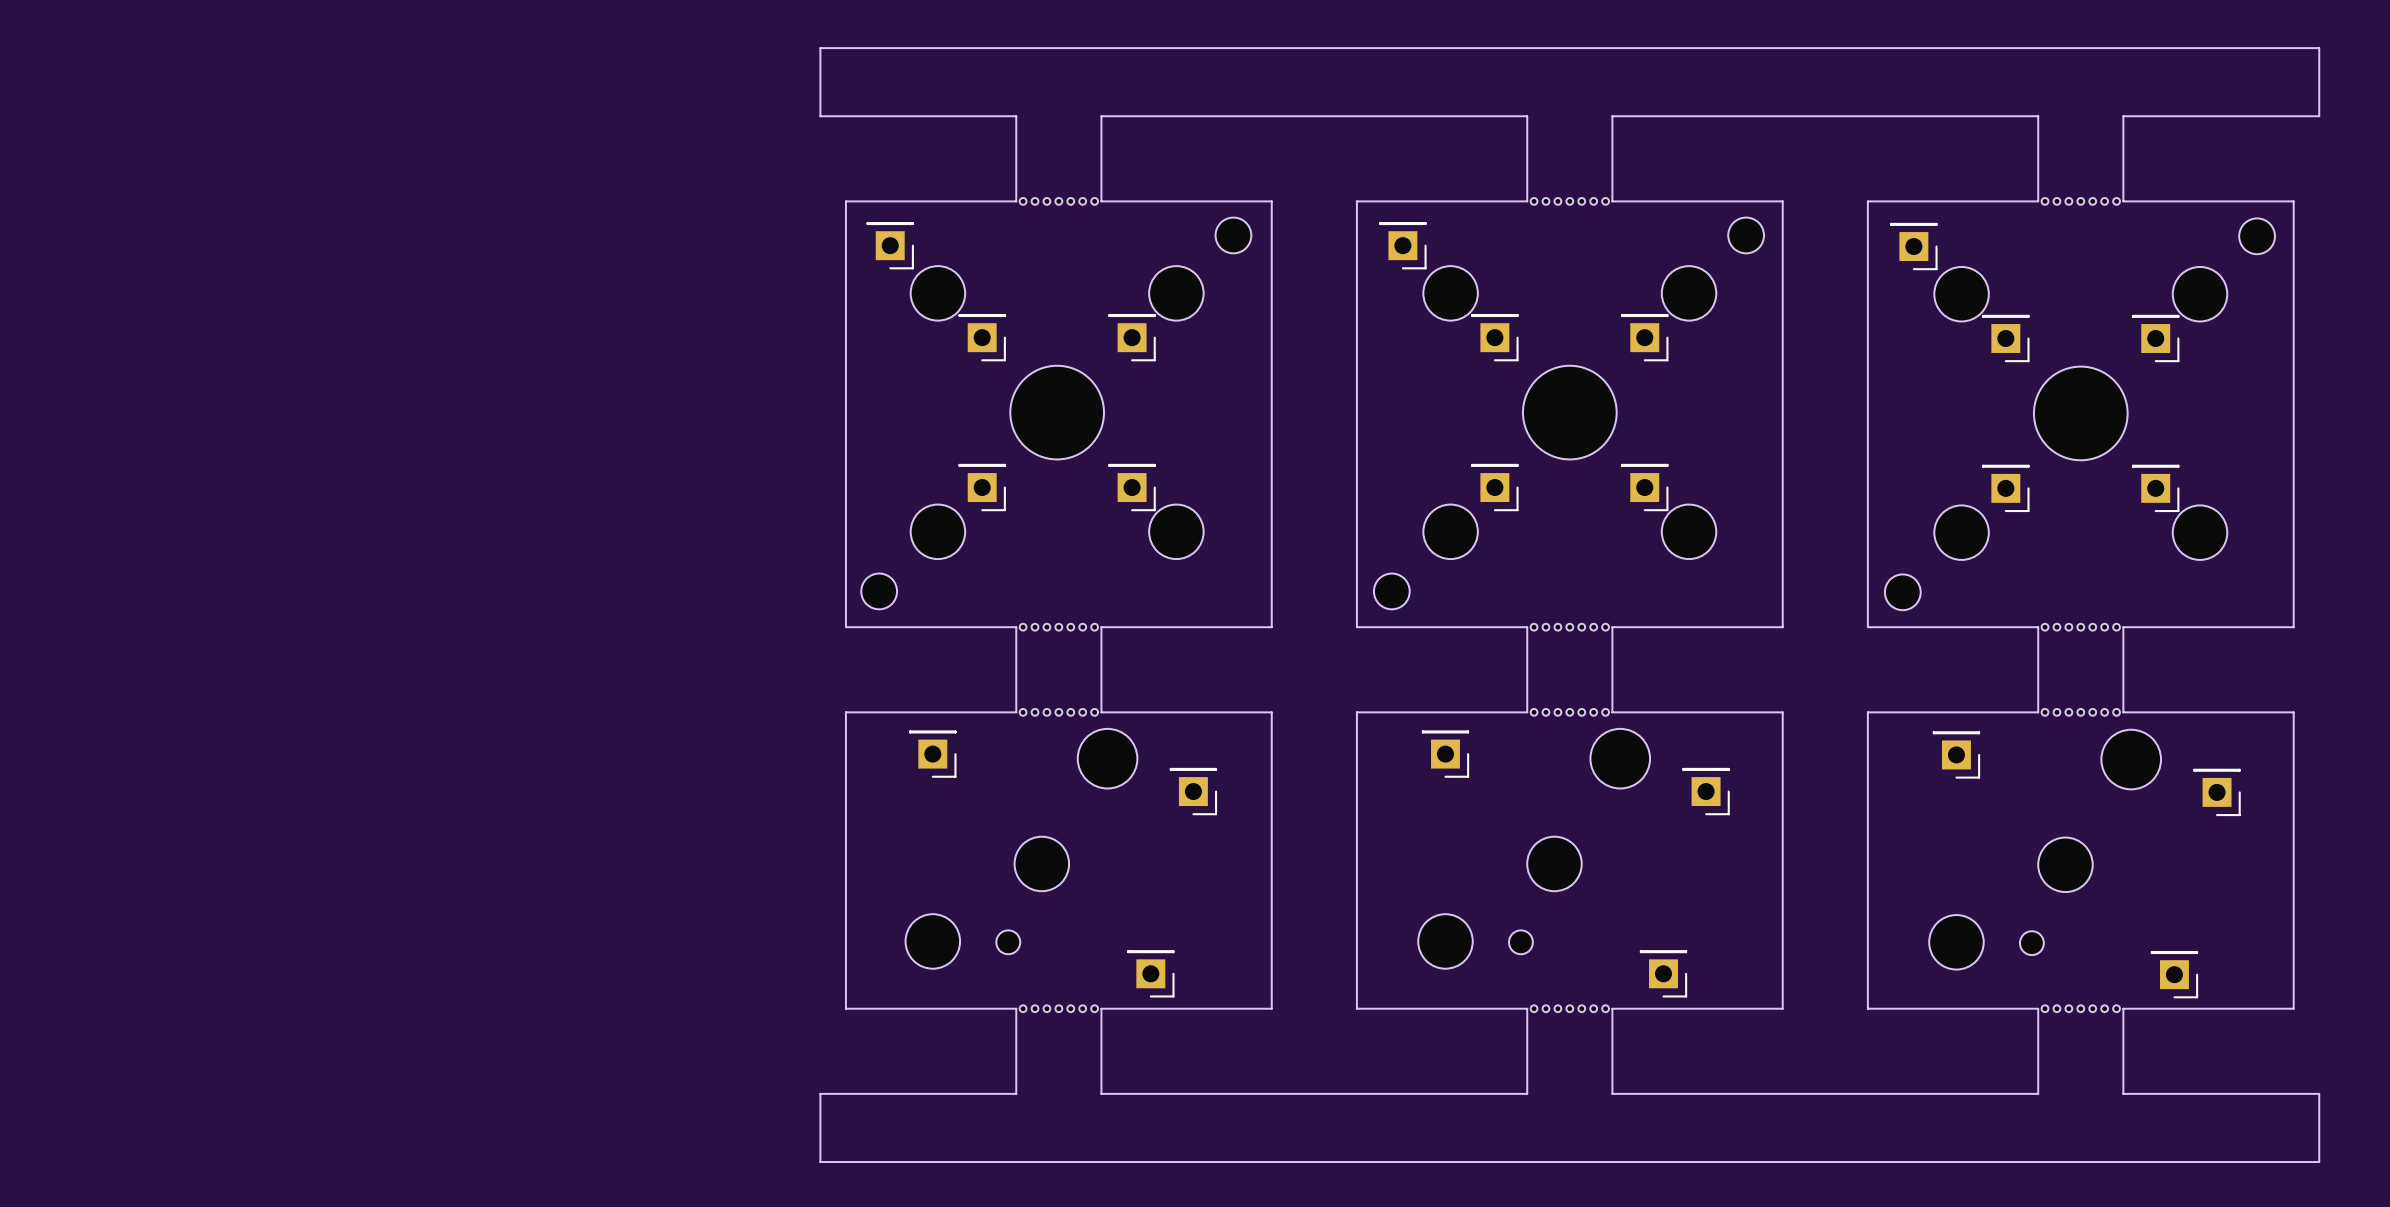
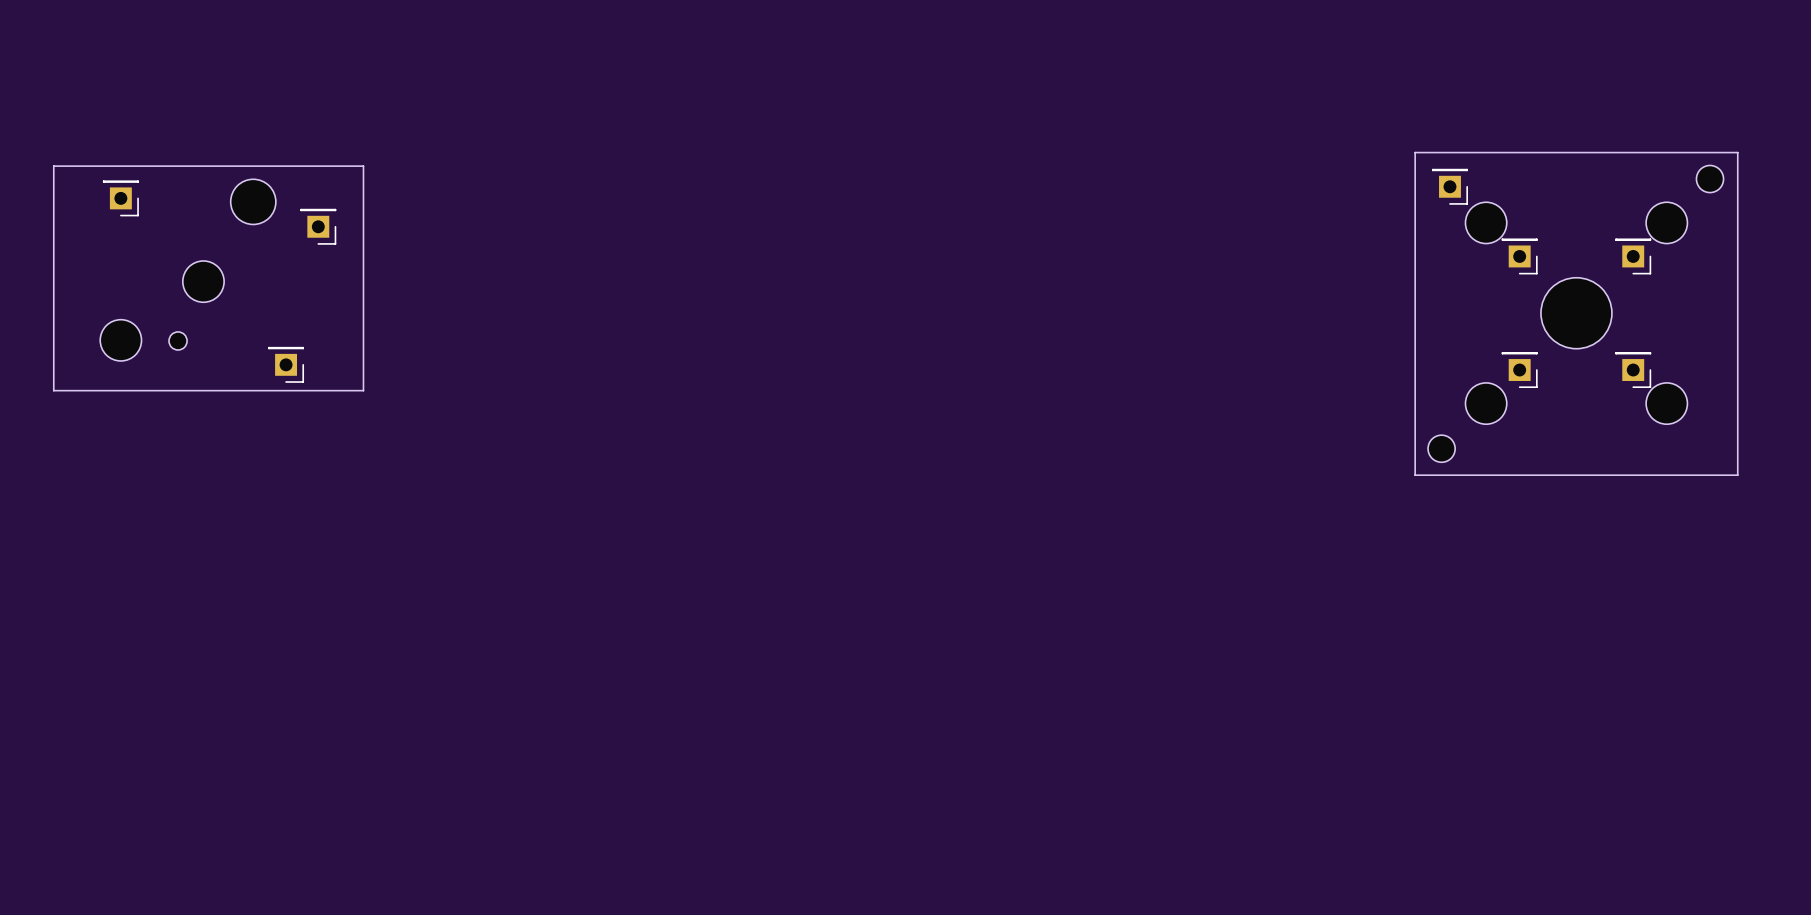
board edge: (1527, 116) (1101, 116) (1101, 201) (1271, 201) (1271, 627) (1101, 627) (1101, 712) (1271, 712) (1271, 1008) (1101, 1008) (1101, 1093) (1527, 1093) (1527, 1008) (1356, 1008) (1356, 712) (1527, 712) (1527, 627) (1356, 627) (1356, 201) (1527, 201) (1527, 116) -> none
part: (1023, 201) -> none
part: (1035, 201) -> none
part: (1046, 201) -> none
part: (1058, 201) -> none
part: (1070, 201) -> none
part: (1082, 201) -> none
part: (1094, 201) -> none
part: (1534, 201) -> none
part: (1545, 201) -> none
part: (1557, 201) -> none
part: (1569, 201) -> none
part: (1581, 201) -> none
part: (1593, 201) -> none
part: (1605, 201) -> none
board edge: (2038, 201) (2038, 116) (1612, 116) (1612, 201) (1782, 201) (1782, 627) (1612, 627) (1612, 712) (1782, 712) (1782, 1008) (1612, 1008) (1612, 1093) (2038, 1093) (2038, 1008) (1867, 1008) (1867, 712) (2038, 712) (2038, 627) -> (1608, 475) (1544, 475)
part: (2045, 201) -> none
part: (2056, 201) -> none
part: (2068, 201) -> none
part: (2080, 201) -> none
part: (2092, 201) -> none
part: (2104, 201) -> none
part: (2116, 201) -> none
board edge: (2123, 201) (2123, 116) (2319, 116) (2319, 48) (820, 48) (820, 116) (1016, 116) (1016, 201) (845, 201) (845, 627) (1016, 627) (1016, 712) (845, 712) (845, 1008) (1016, 1008) (1016, 1093) (820, 1093) (820, 1162) (2319, 1162) (2319, 1093) (2123, 1093) (2123, 1008) (2293, 1008) (2293, 712) (2123, 712) (2123, 627) -> (1608, 152) (1544, 152)
board edge: none -> (363, 166) (363, 390) (53, 390) (53, 166) (363, 166)
part: (1233, 235) -> none
part: (1746, 235) -> none
part: (890, 245) -> none
part: (1402, 245) -> none
part: none -> (120, 198)
part: none -> (253, 201)
part: (937, 293) -> none
part: (1176, 293) -> none
part: (1450, 293) -> none
part: (1689, 293) -> none
part: none -> (318, 226)
part: (982, 337) -> none
part: (1132, 337) -> none
part: (1494, 337) -> none
part: (1644, 337) -> none
part: none -> (203, 281)
part: (1057, 412) -> none
part: (1569, 412) -> none
part: none -> (120, 340)
part: none -> (178, 340)
part: none -> (286, 364)
part: (982, 487) -> none
part: (1132, 487) -> none
part: (1494, 487) -> none
part: (1644, 487) -> none
part: (937, 531) -> none
part: (1176, 531) -> none
part: (1450, 531) -> none
part: (1689, 531) -> none
part: (879, 591) -> none
part: (1391, 591) -> none
part: (1023, 627) -> none
part: (1035, 627) -> none
part: (1046, 627) -> none
part: (1058, 627) -> none
part: (1070, 627) -> none
part: (1082, 627) -> none
part: (1094, 627) -> none
part: (1534, 627) -> none
part: (1545, 627) -> none
part: (1557, 627) -> none
part: (1569, 627) -> none
part: (1581, 627) -> none
part: (1593, 627) -> none
part: (1605, 627) -> none
part: (2045, 627) -> none
part: (2056, 627) -> none
part: (2068, 627) -> none
part: (2080, 627) -> none
part: (2092, 627) -> none
part: (2104, 627) -> none
part: (2116, 627) -> none
part: (1023, 712) -> none
part: (1035, 712) -> none
part: (1046, 712) -> none
part: (1058, 712) -> none
part: (1070, 712) -> none
part: (1082, 712) -> none
part: (1094, 712) -> none
part: (1534, 712) -> none
part: (1545, 712) -> none
part: (1557, 712) -> none
part: (1569, 712) -> none
part: (1581, 712) -> none
part: (1593, 712) -> none
part: (1605, 712) -> none
part: (2045, 712) -> none
part: (2056, 712) -> none
part: (2068, 712) -> none
part: (2080, 712) -> none
part: (2092, 712) -> none
part: (2104, 712) -> none
part: (2116, 712) -> none
part: (932, 754) -> none
part: (1445, 754) -> none
part: (1956, 754) -> none
part: (1107, 758) -> none
part: (1620, 758) -> none
part: (2131, 759) -> none
part: (1193, 791) -> none
part: (1706, 791) -> none
part: (2217, 792) -> none
part: (1041, 863) -> none
part: (1554, 863) -> none
part: (2065, 864) -> none
part: (932, 941) -> none
part: (1445, 941) -> none
part: (1008, 942) -> none
part: (1520, 942) -> none
part: (1956, 942) -> none
part: (2031, 943) -> none
part: (1150, 973) -> none
part: (1663, 973) -> none
part: (2174, 974) -> none
part: (1023, 1008) -> none
part: (1035, 1008) -> none
part: (1046, 1008) -> none
part: (1058, 1008) -> none
part: (1070, 1008) -> none
part: (1082, 1008) -> none
part: (1094, 1008) -> none
part: (1534, 1008) -> none
part: (1545, 1008) -> none
part: (1557, 1008) -> none
part: (1569, 1008) -> none
part: (1581, 1008) -> none
part: (1593, 1008) -> none
part: (1605, 1008) -> none
part: (2045, 1008) -> none
part: (2056, 1008) -> none
part: (2068, 1008) -> none
part: (2080, 1008) -> none
part: (2092, 1008) -> none
part: (2104, 1008) -> none
part: (2116, 1008) -> none

